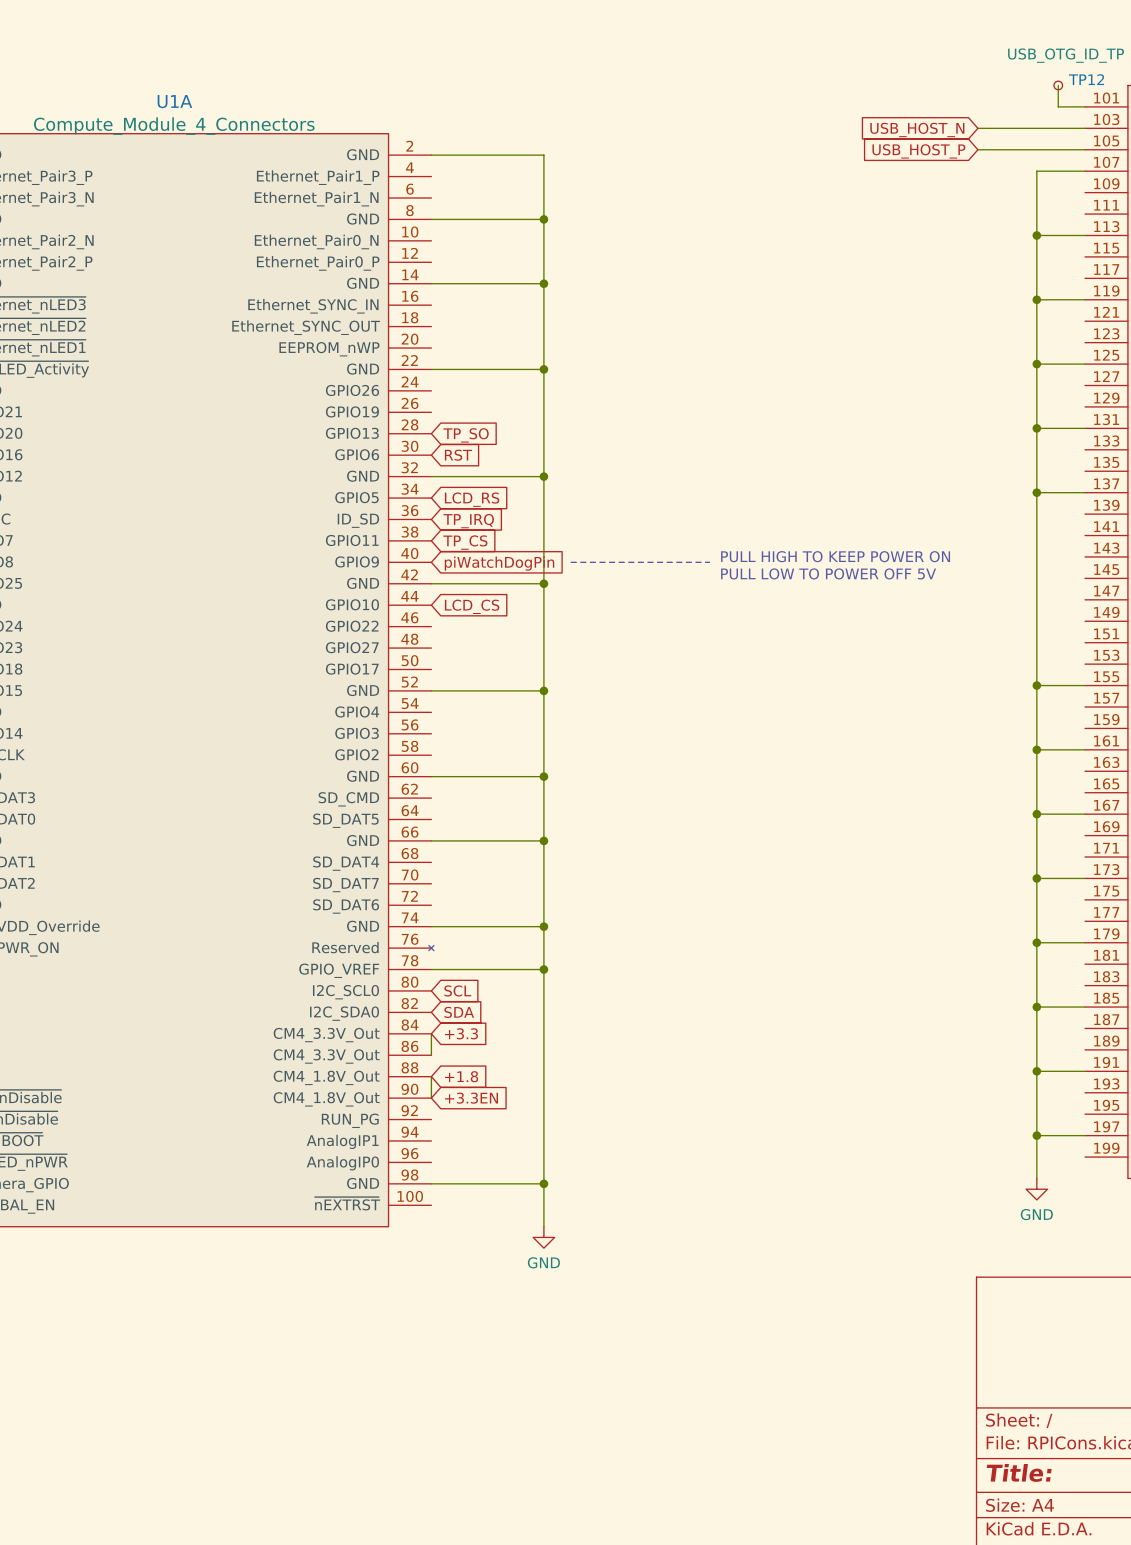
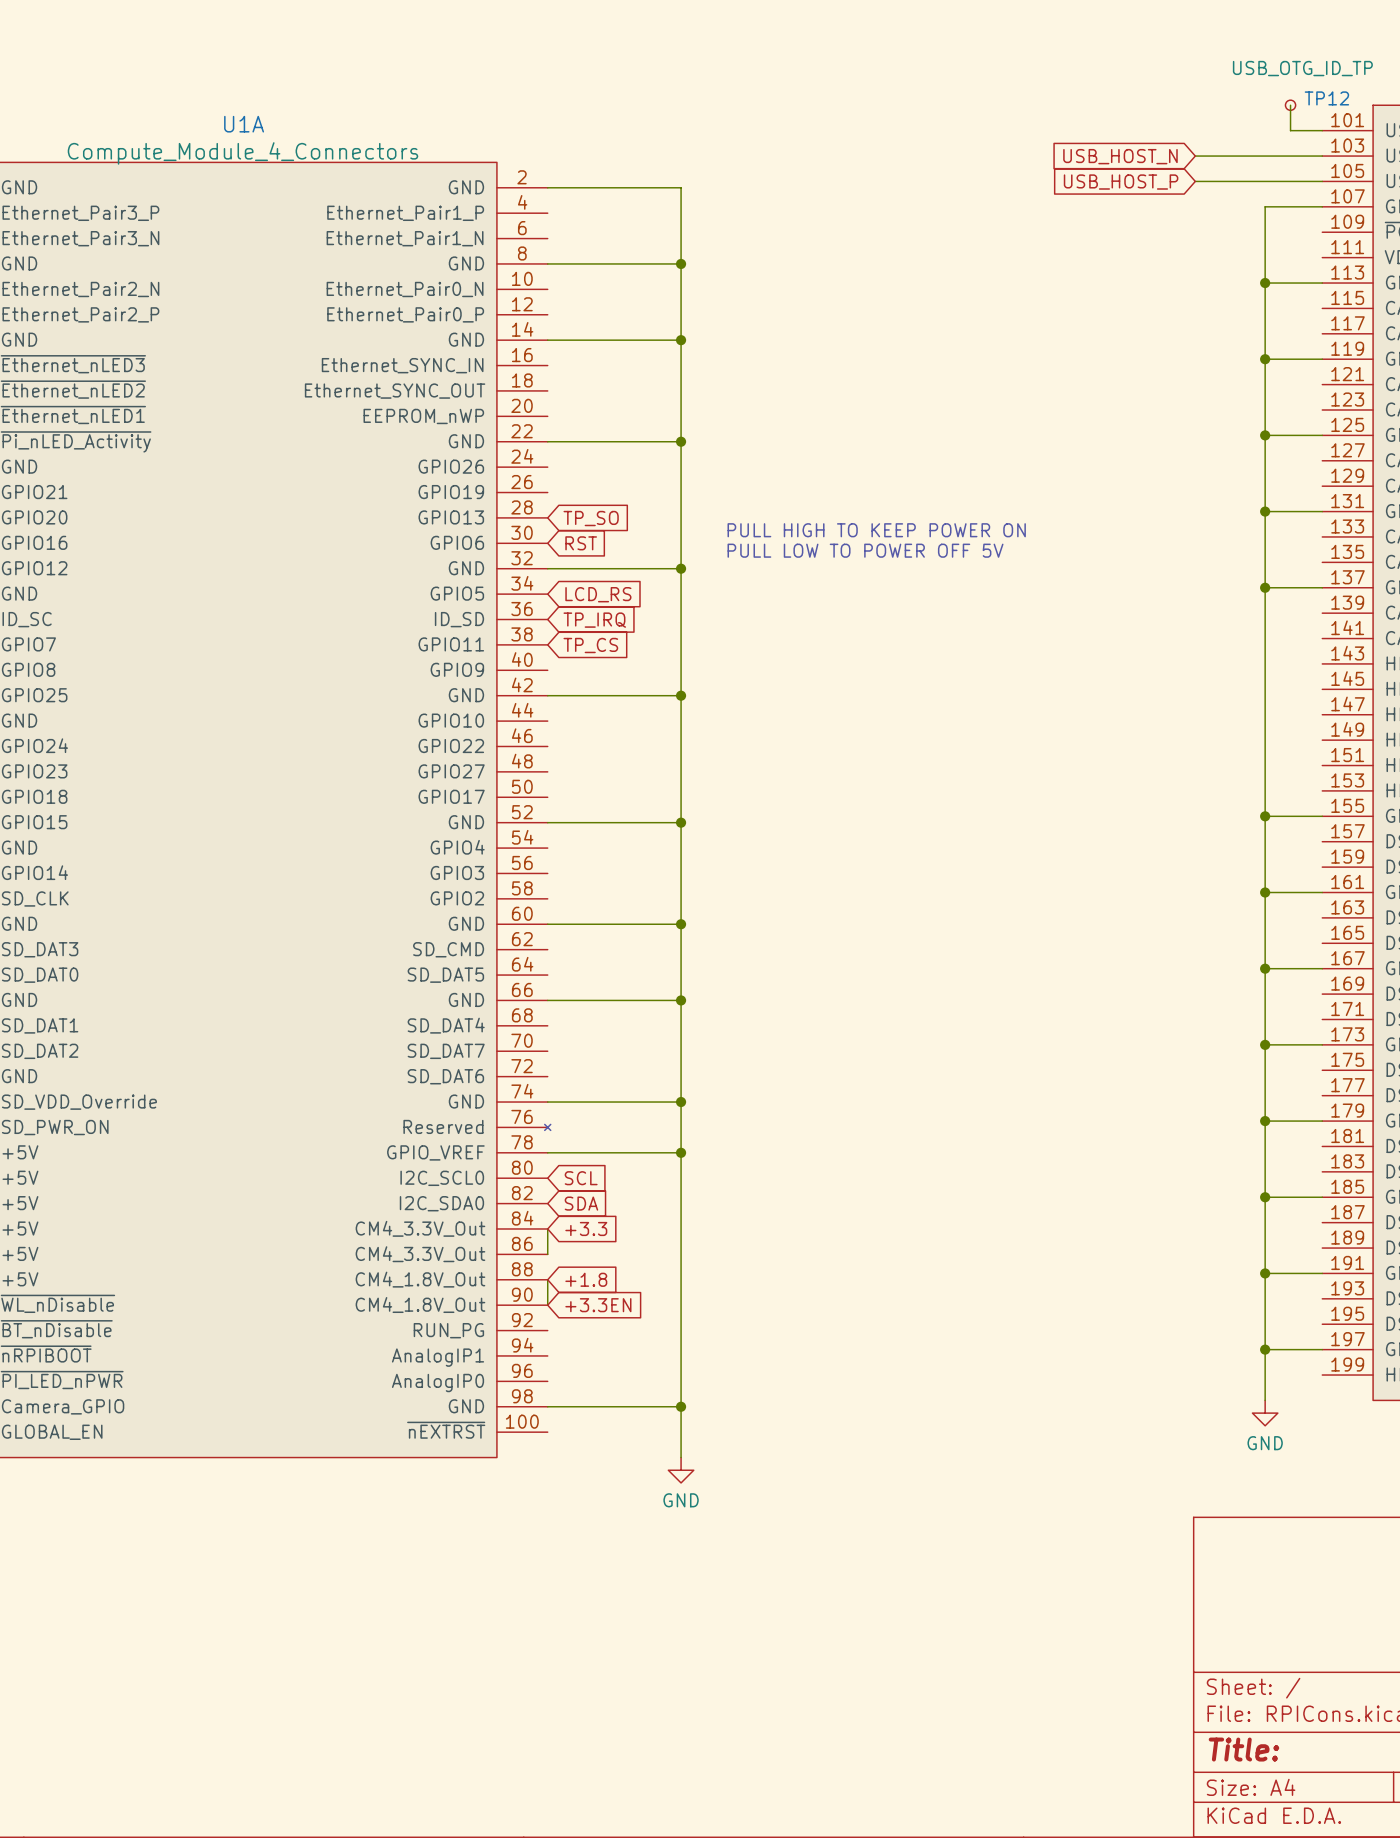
text position: PULL HIGH TO KEEP POWER ON (835, 556) -> PULL HIGH TO KEEP POWER ON (876, 530)
line: (570, 562) (710, 562) -> none
global label: piWatchDogPin (499, 563) -> none
text position: PULL LOW TO POWER OFF 5V (828, 573) -> PULL LOW TO POWER OFF 5V (865, 550)
global label: LCD_CS (472, 606) -> none

